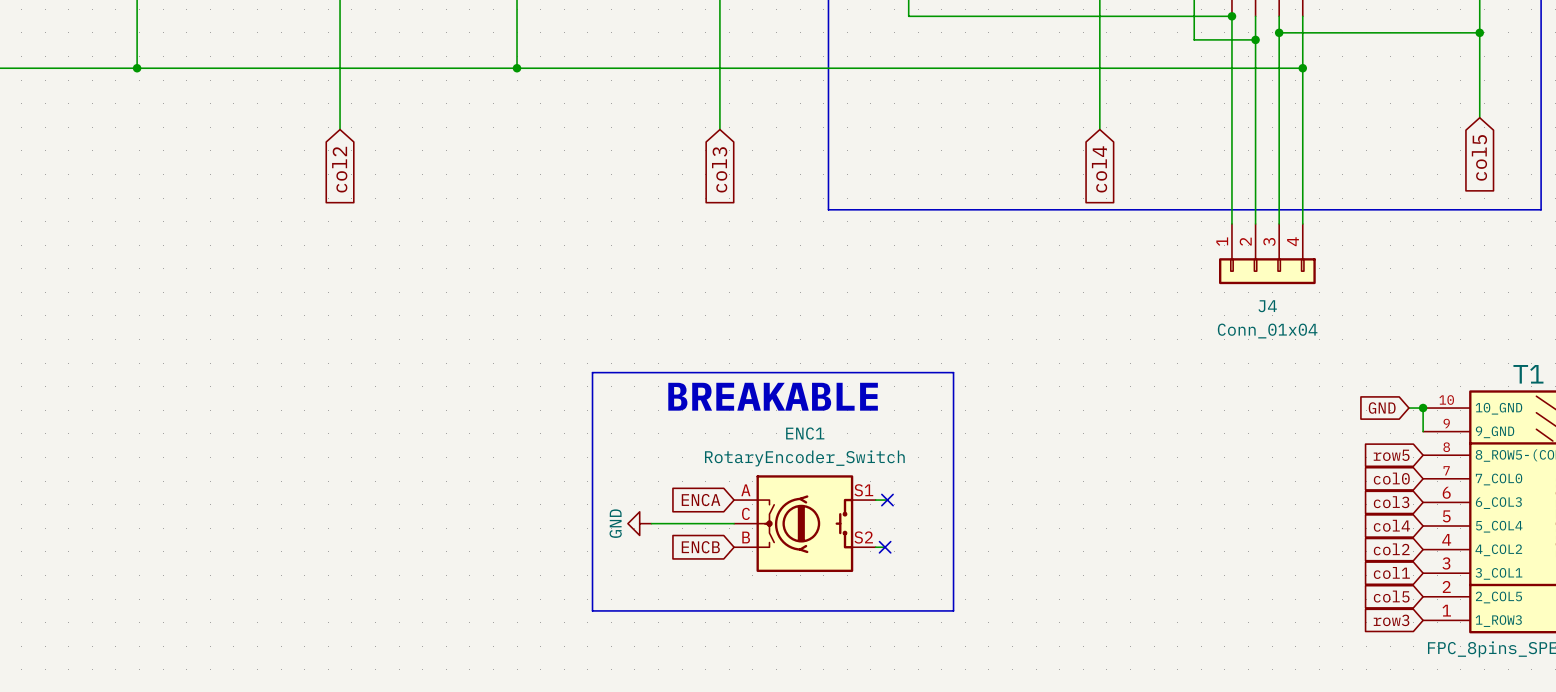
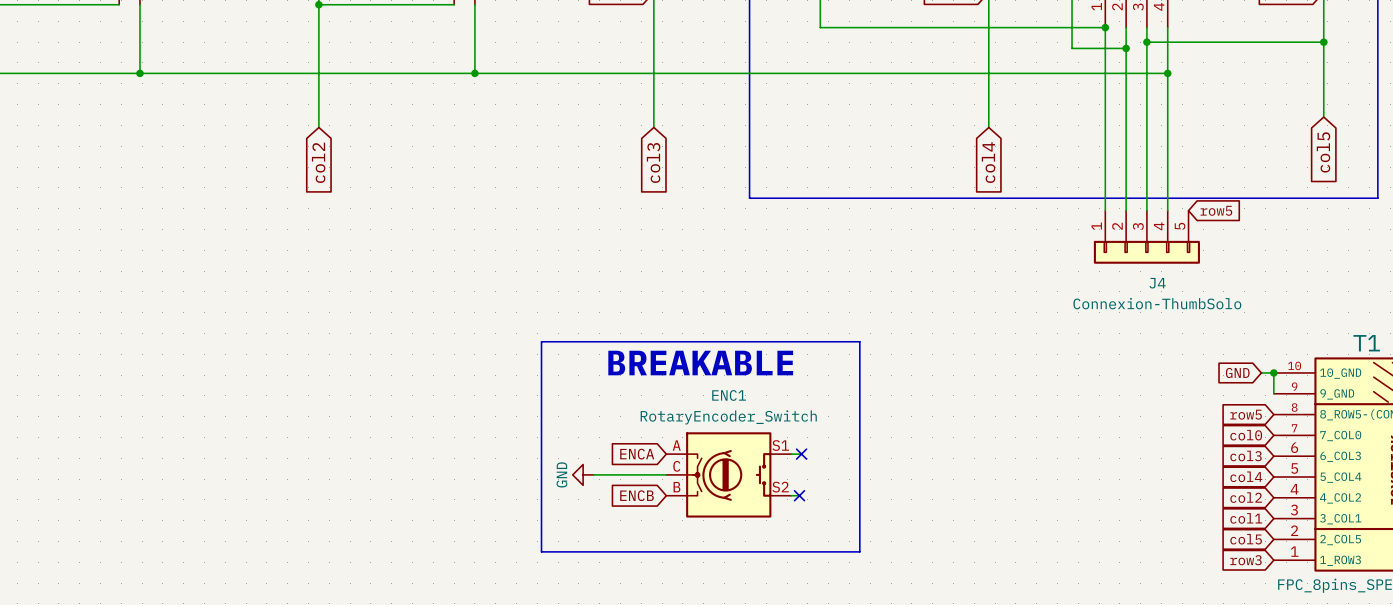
J4 symbol: [1219, 223, 1316, 285] -> [1093, 210, 1200, 264]
global label: none -> row5 (1216, 210)
J4 value: Conn_01x04 (1267, 331) -> Connexion-ThumbSolo (1157, 303)

